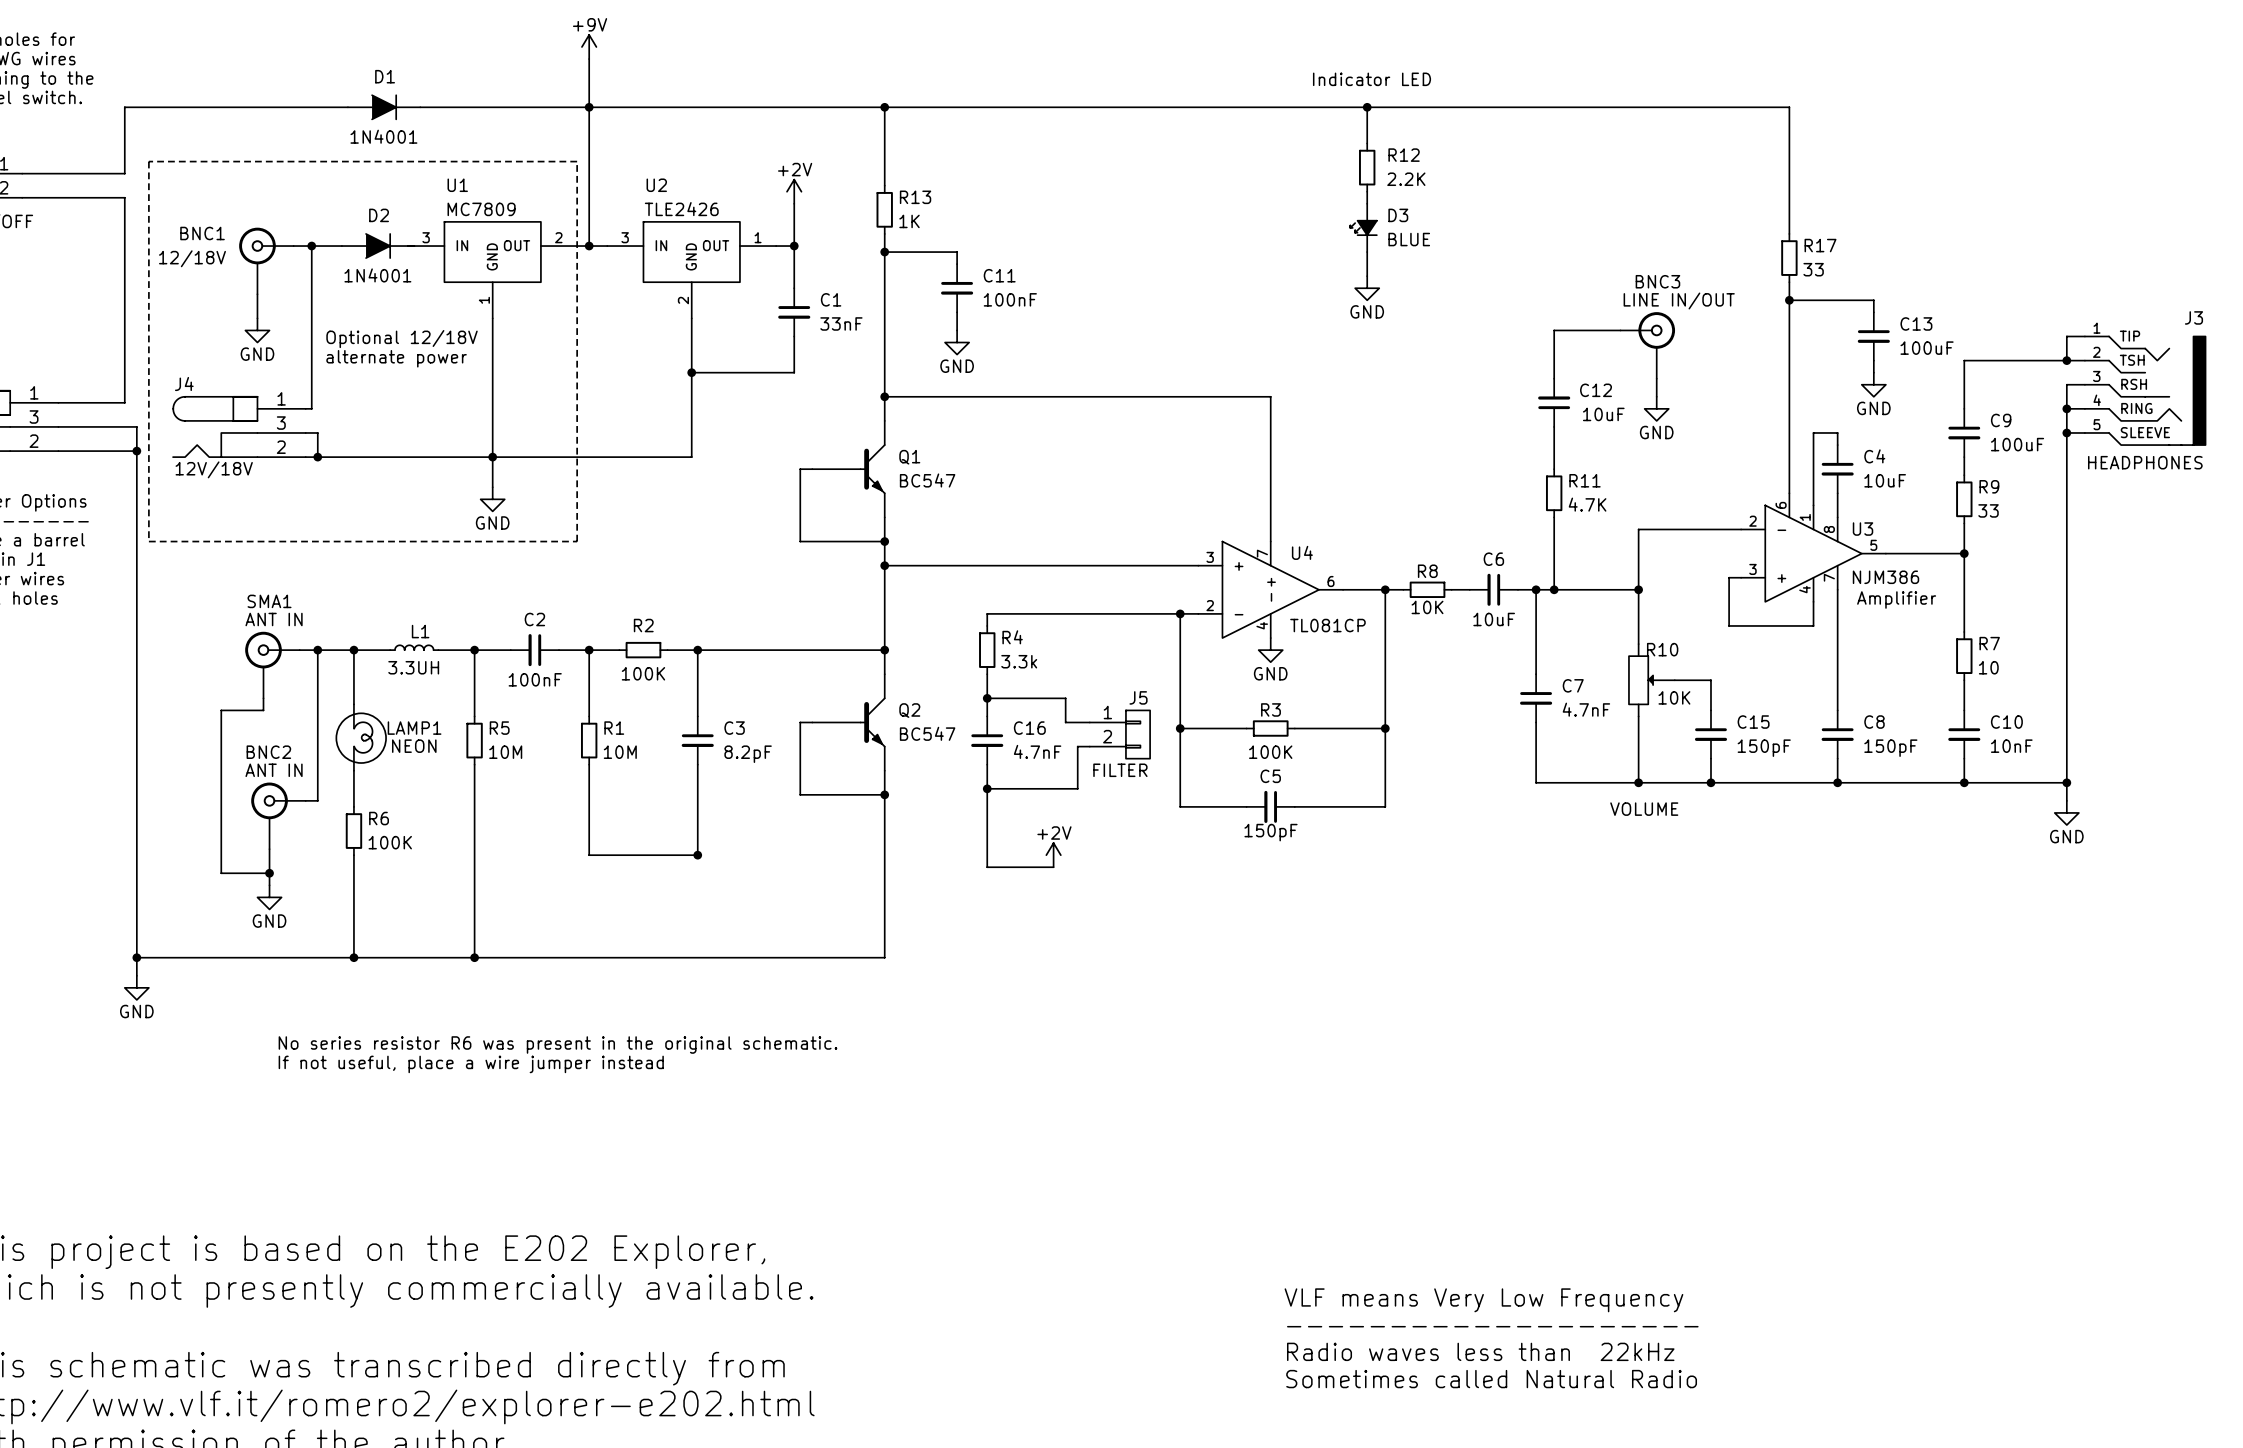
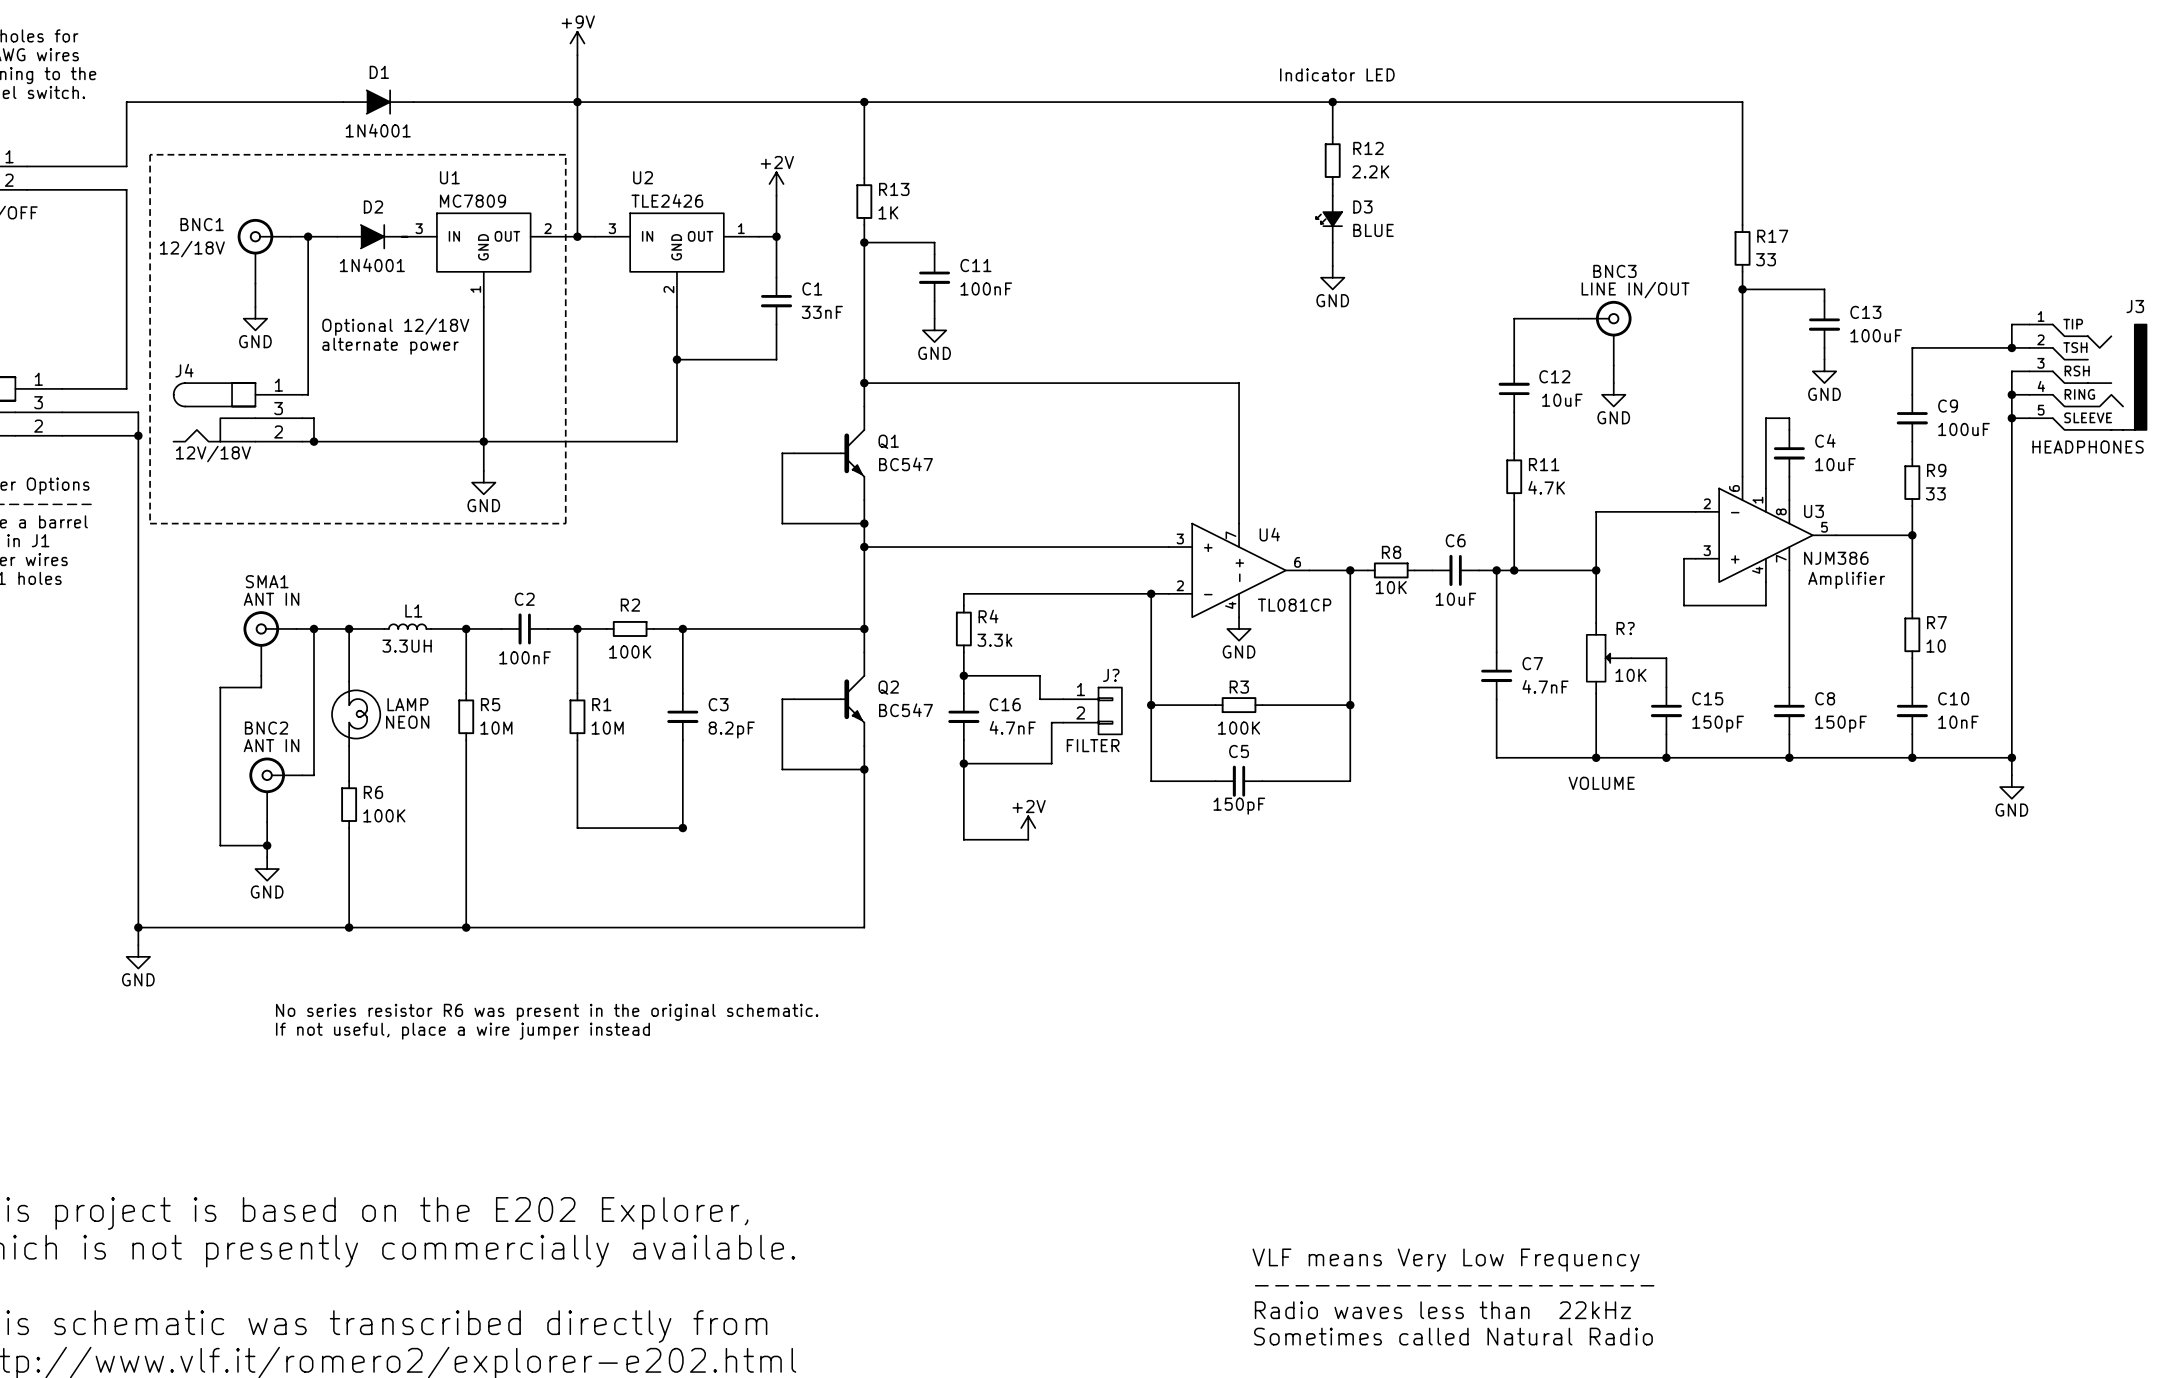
R10 name: R10 (1662, 649) -> R? (1625, 628)
J5 name: J5 (1138, 697) -> J? (1111, 675)
LAMP1 name: LAMP1 (414, 728) -> LAMP (407, 704)

